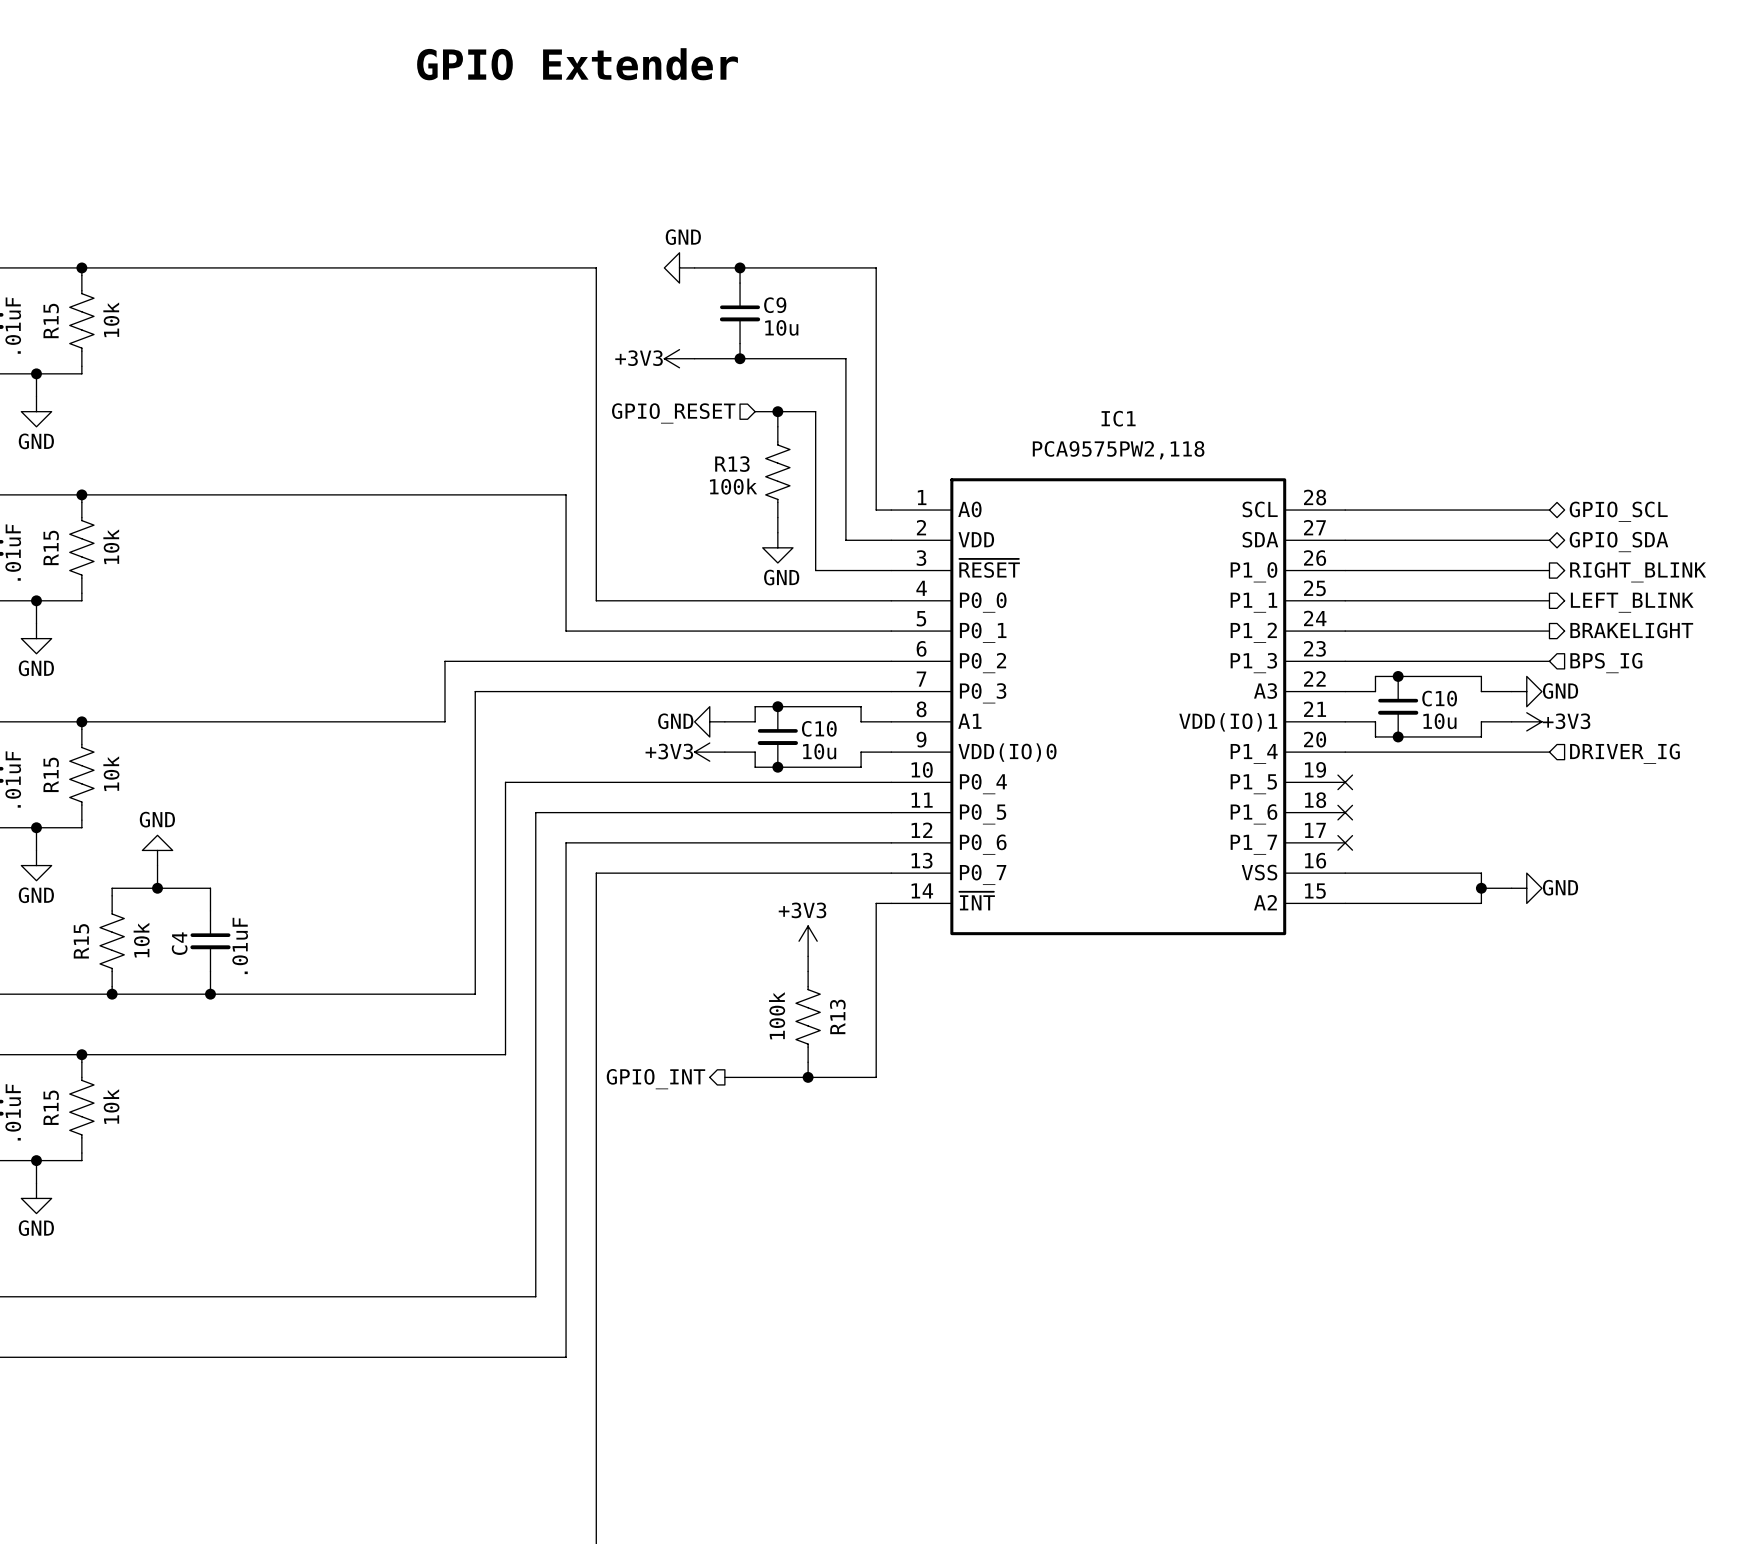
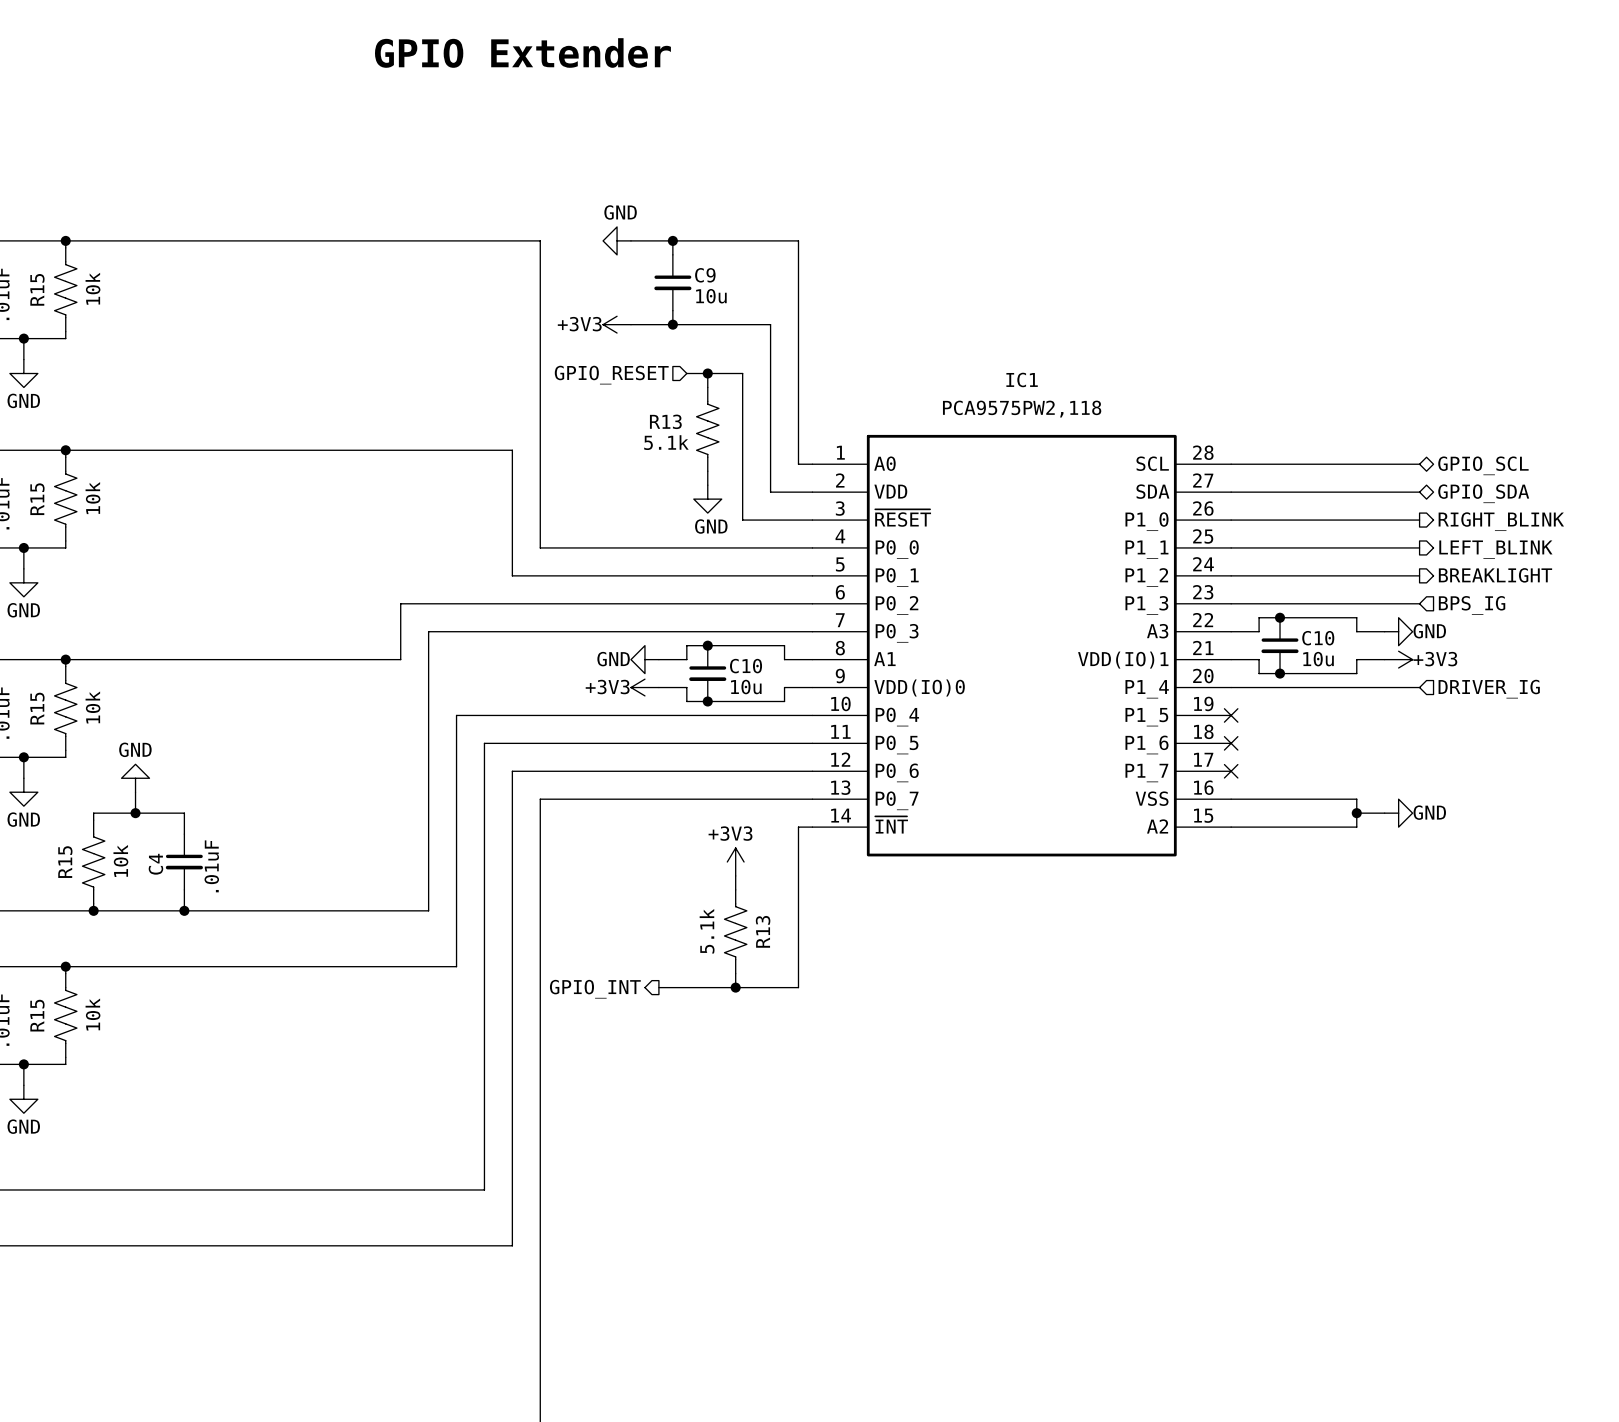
R13 value: 100k (733, 486) -> 5.1k (666, 442)
hierarchical label: BRAKELIGHT (1631, 630) -> BREAKLIGHT (1495, 575)
R13 value: 100k (777, 1015) -> 5.1k (707, 931)

